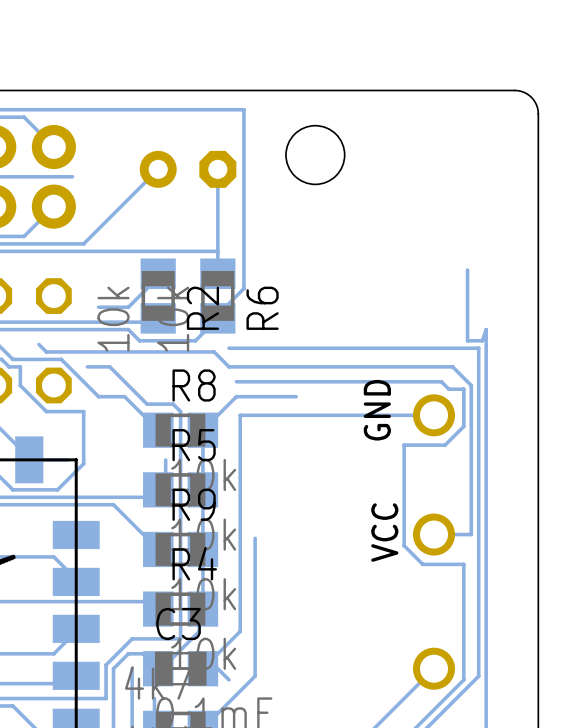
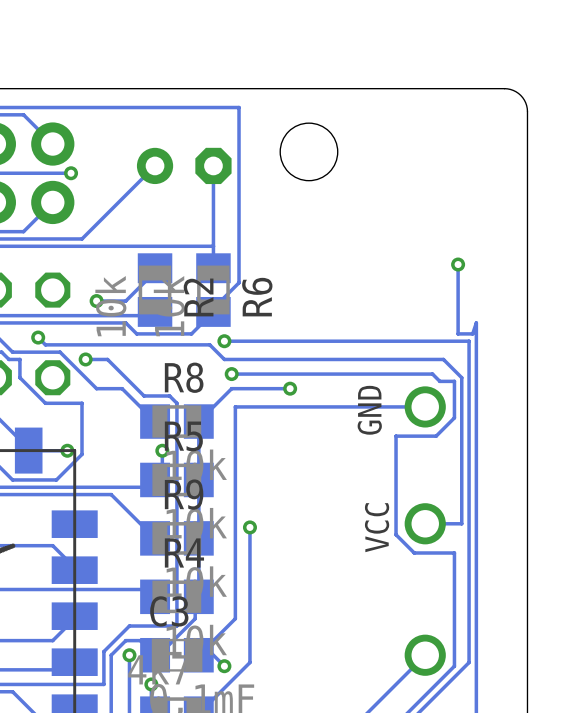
via: none -> (71, 173)
via: none -> (458, 264)
via: none -> (96, 301)
via: none -> (38, 337)
via: none -> (224, 341)
via: none -> (85, 359)
via: none -> (231, 374)
via: none -> (290, 388)
via: none -> (67, 450)
via: none -> (162, 450)
via: none -> (249, 527)
via: none -> (129, 655)
via: none -> (224, 666)
via: none -> (151, 684)

